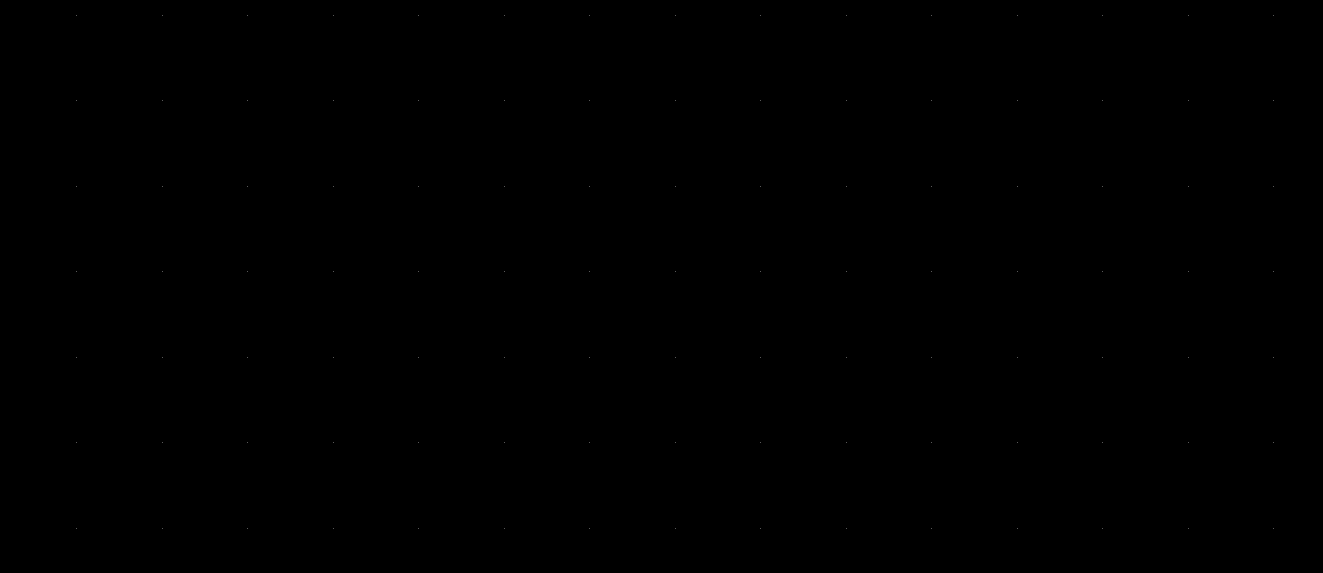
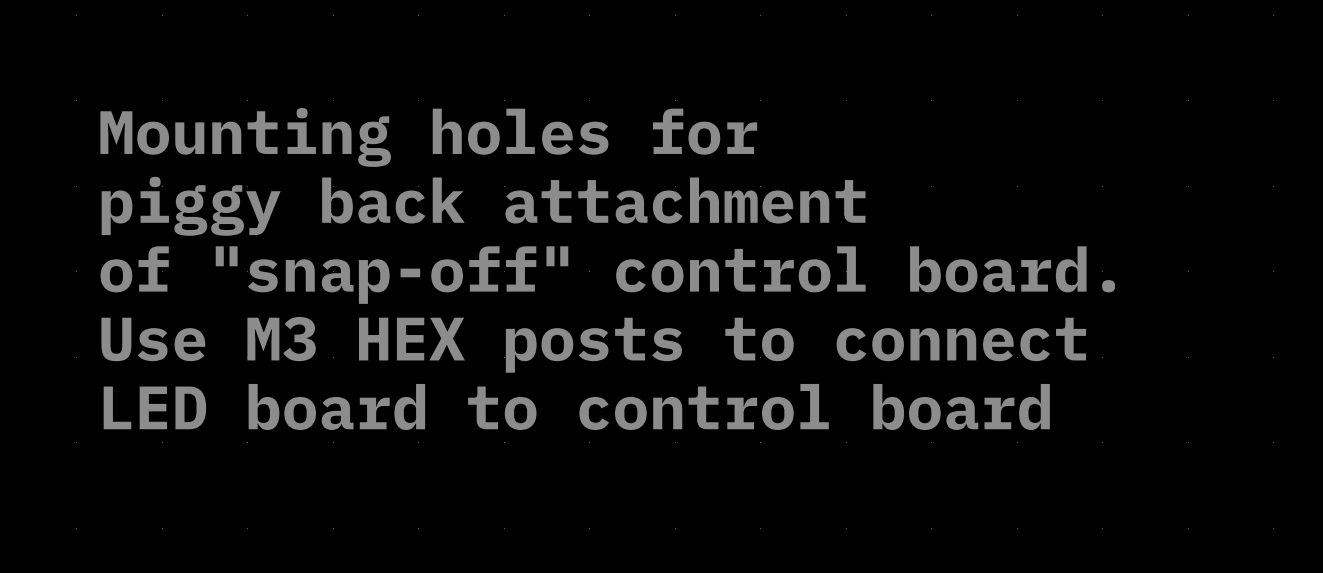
text: none -> Mounting holes for (428, 137)
text: none -> piggy back attachment (483, 206)
text: none -> of "snap-off" control board. (607, 275)
text: none -> Use M3 HEX posts to connect (593, 344)
text: none -> LED board to control board (576, 406)

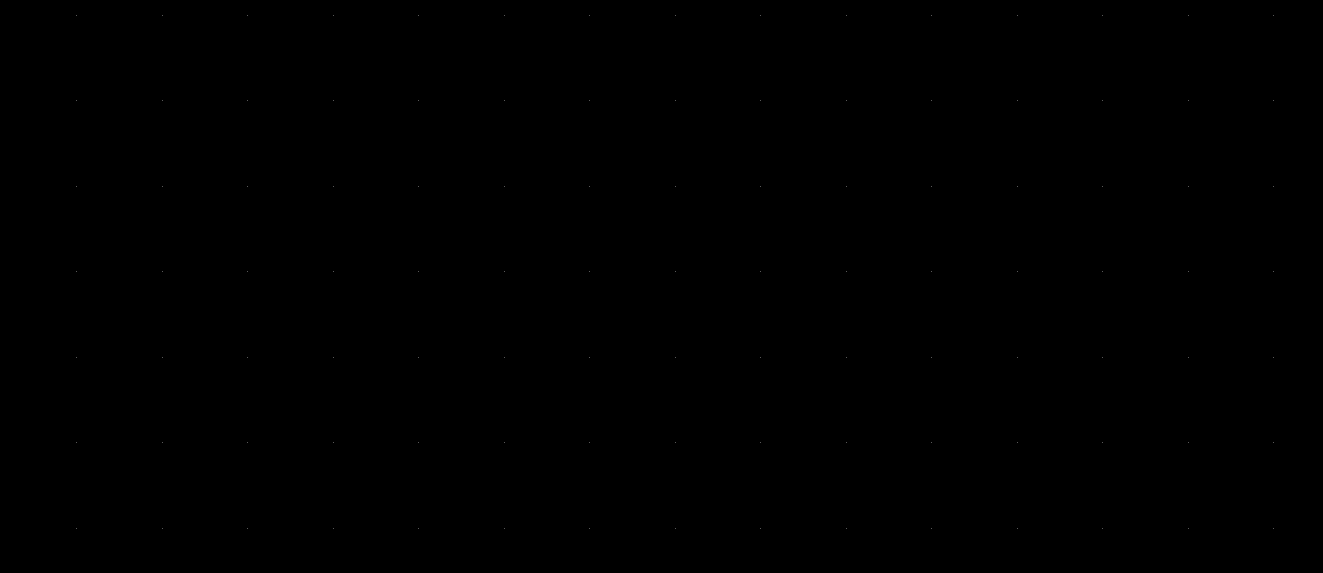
text: Mounting holes for (428, 137) -> none
text: piggy back attachment (483, 206) -> none
text: of "snap-off" control board. (607, 275) -> none
text: Use M3 HEX posts to connect (593, 344) -> none
text: LED board to control board (576, 406) -> none

